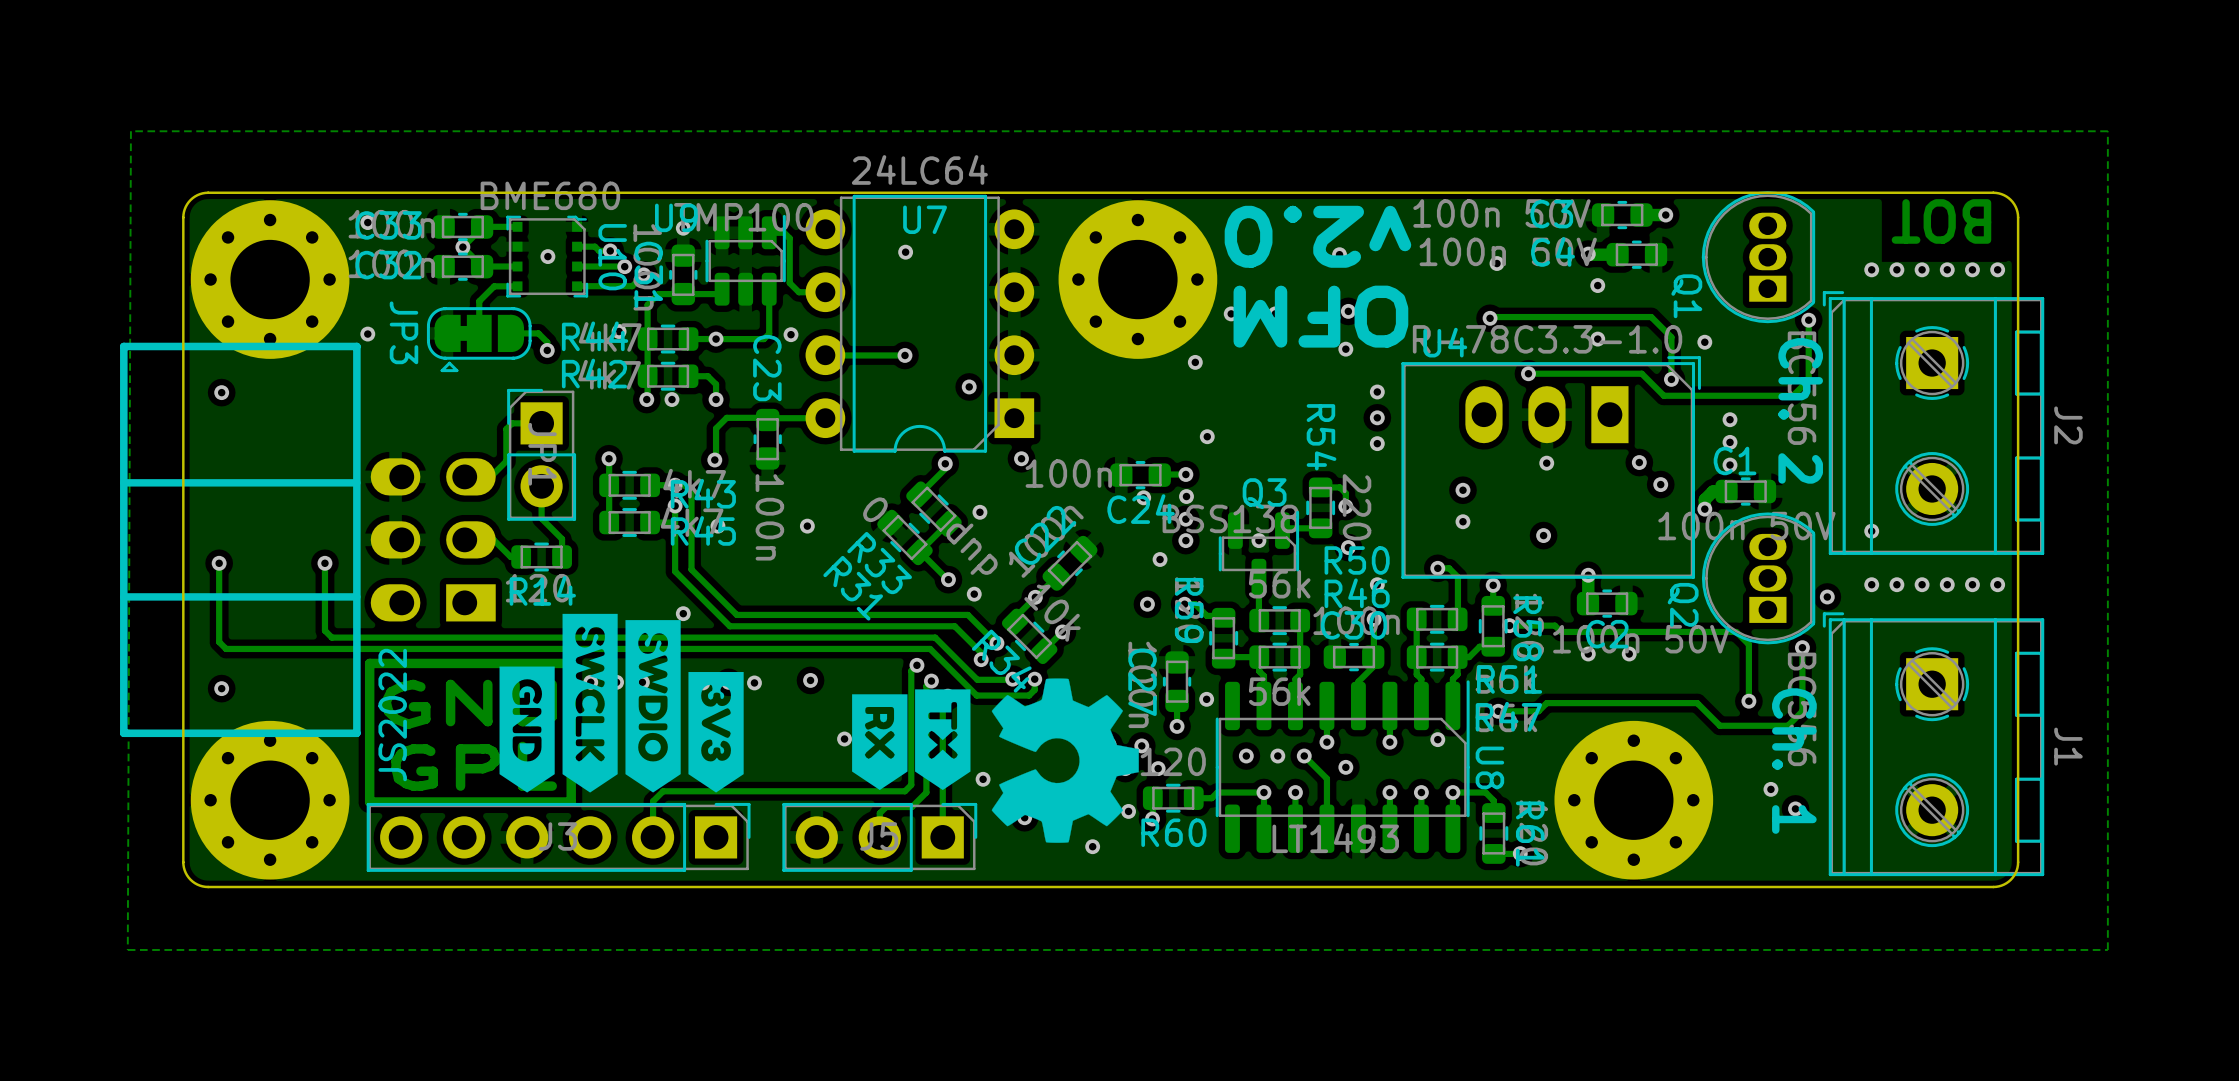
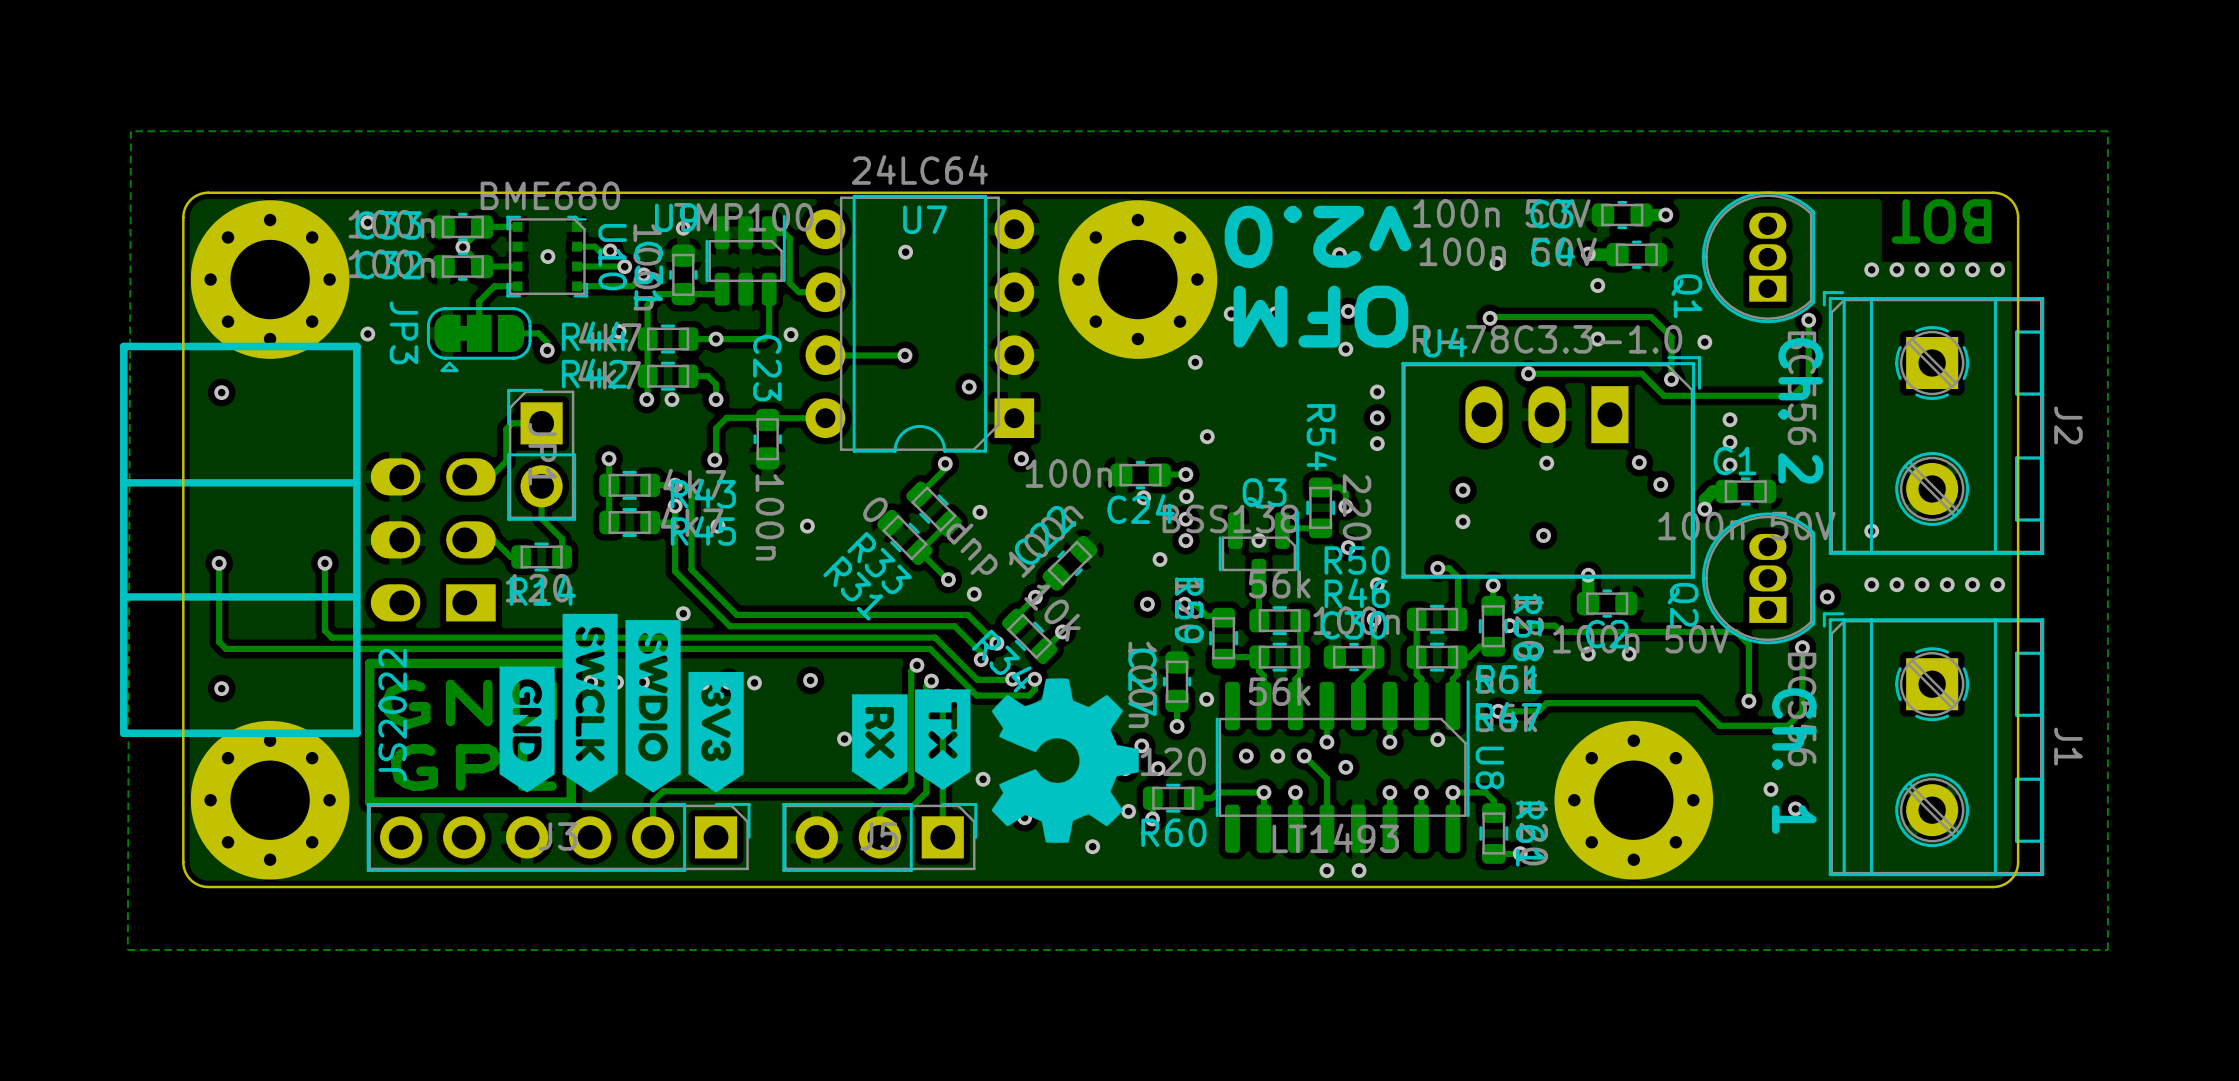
via: none -> (1326, 870)
via: none -> (1359, 870)

